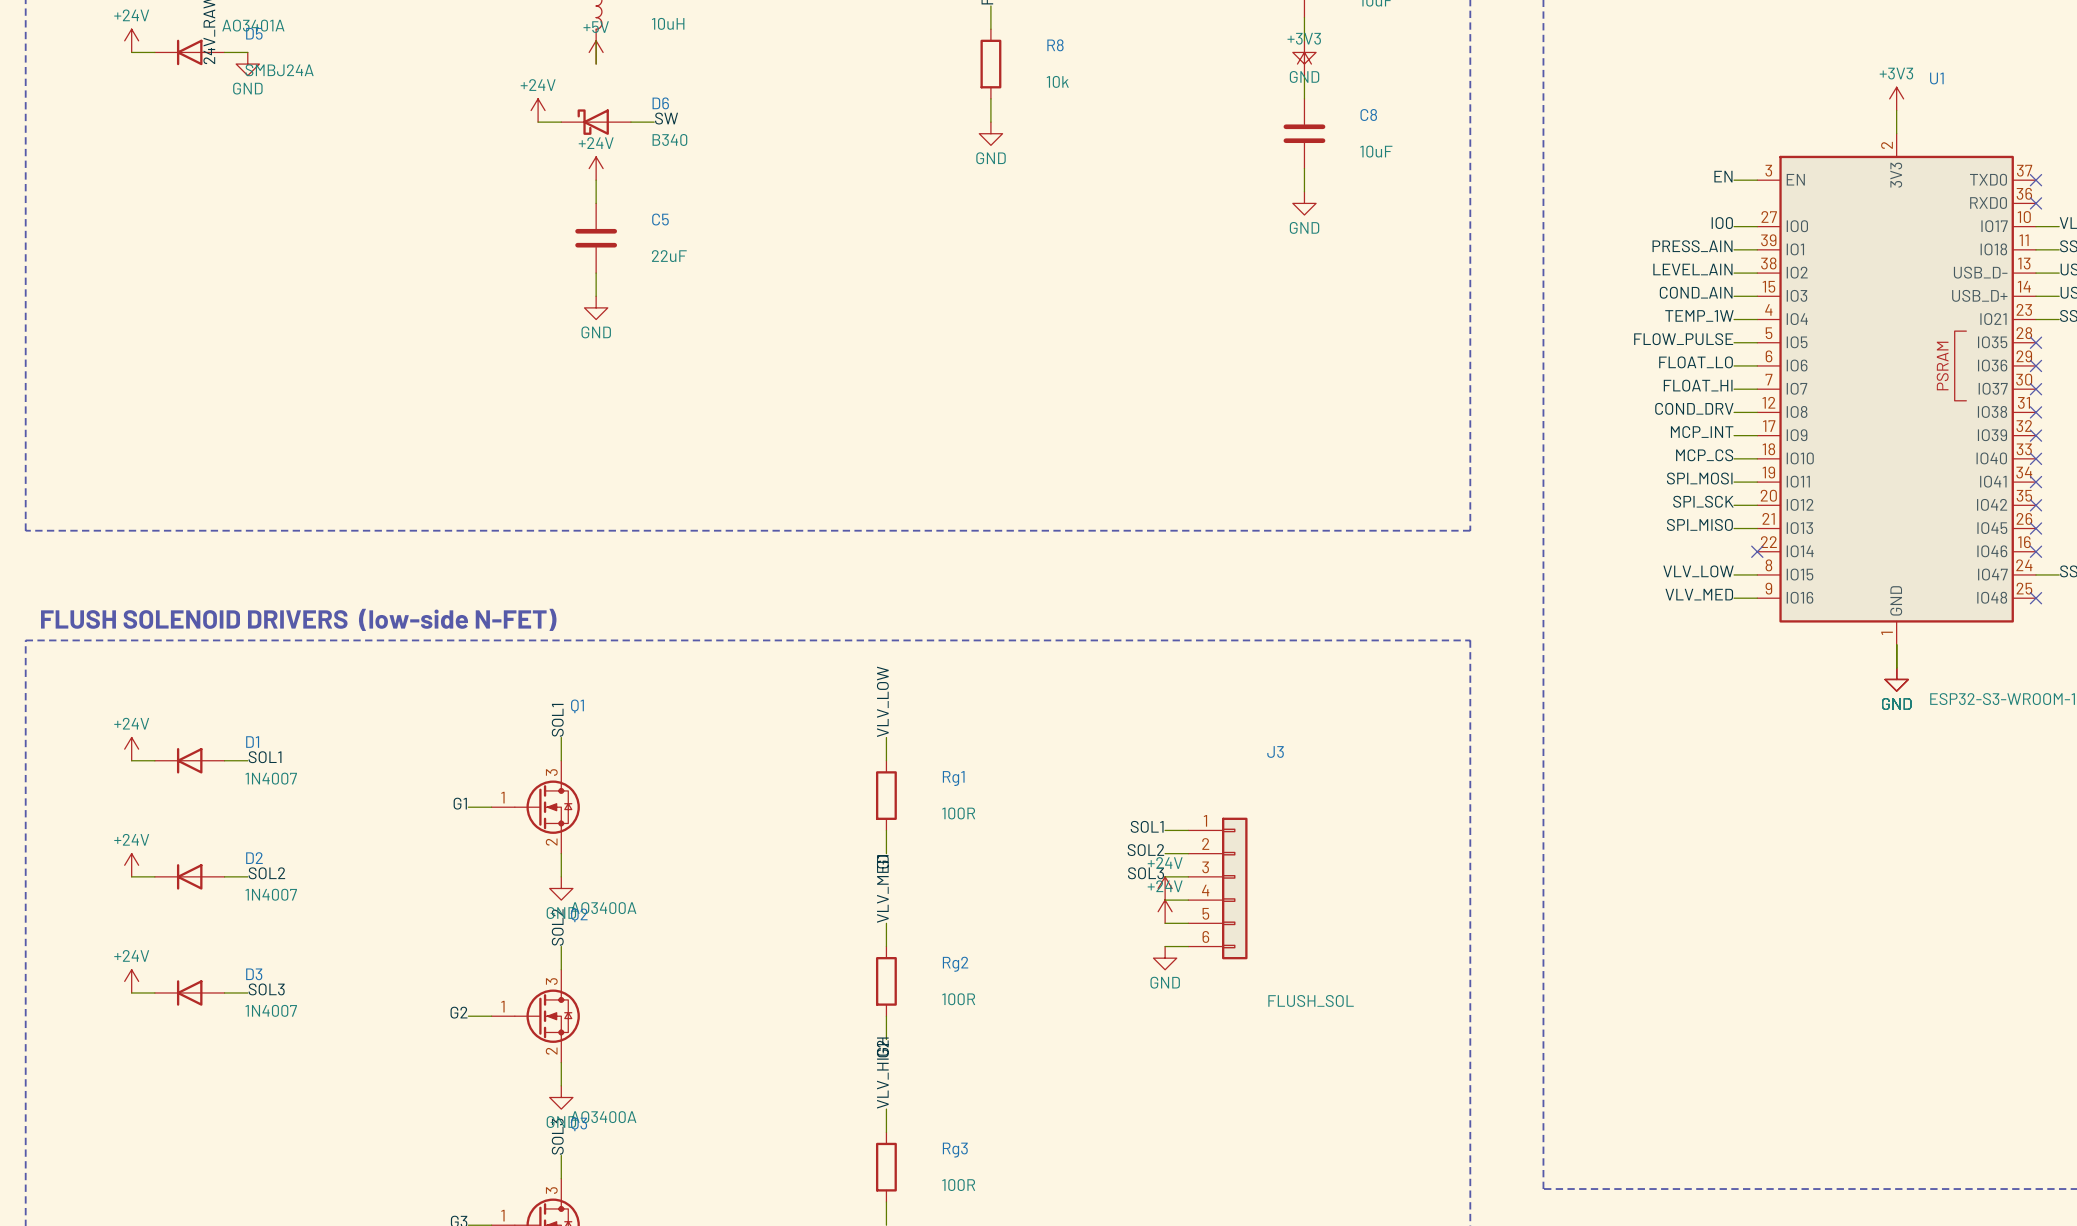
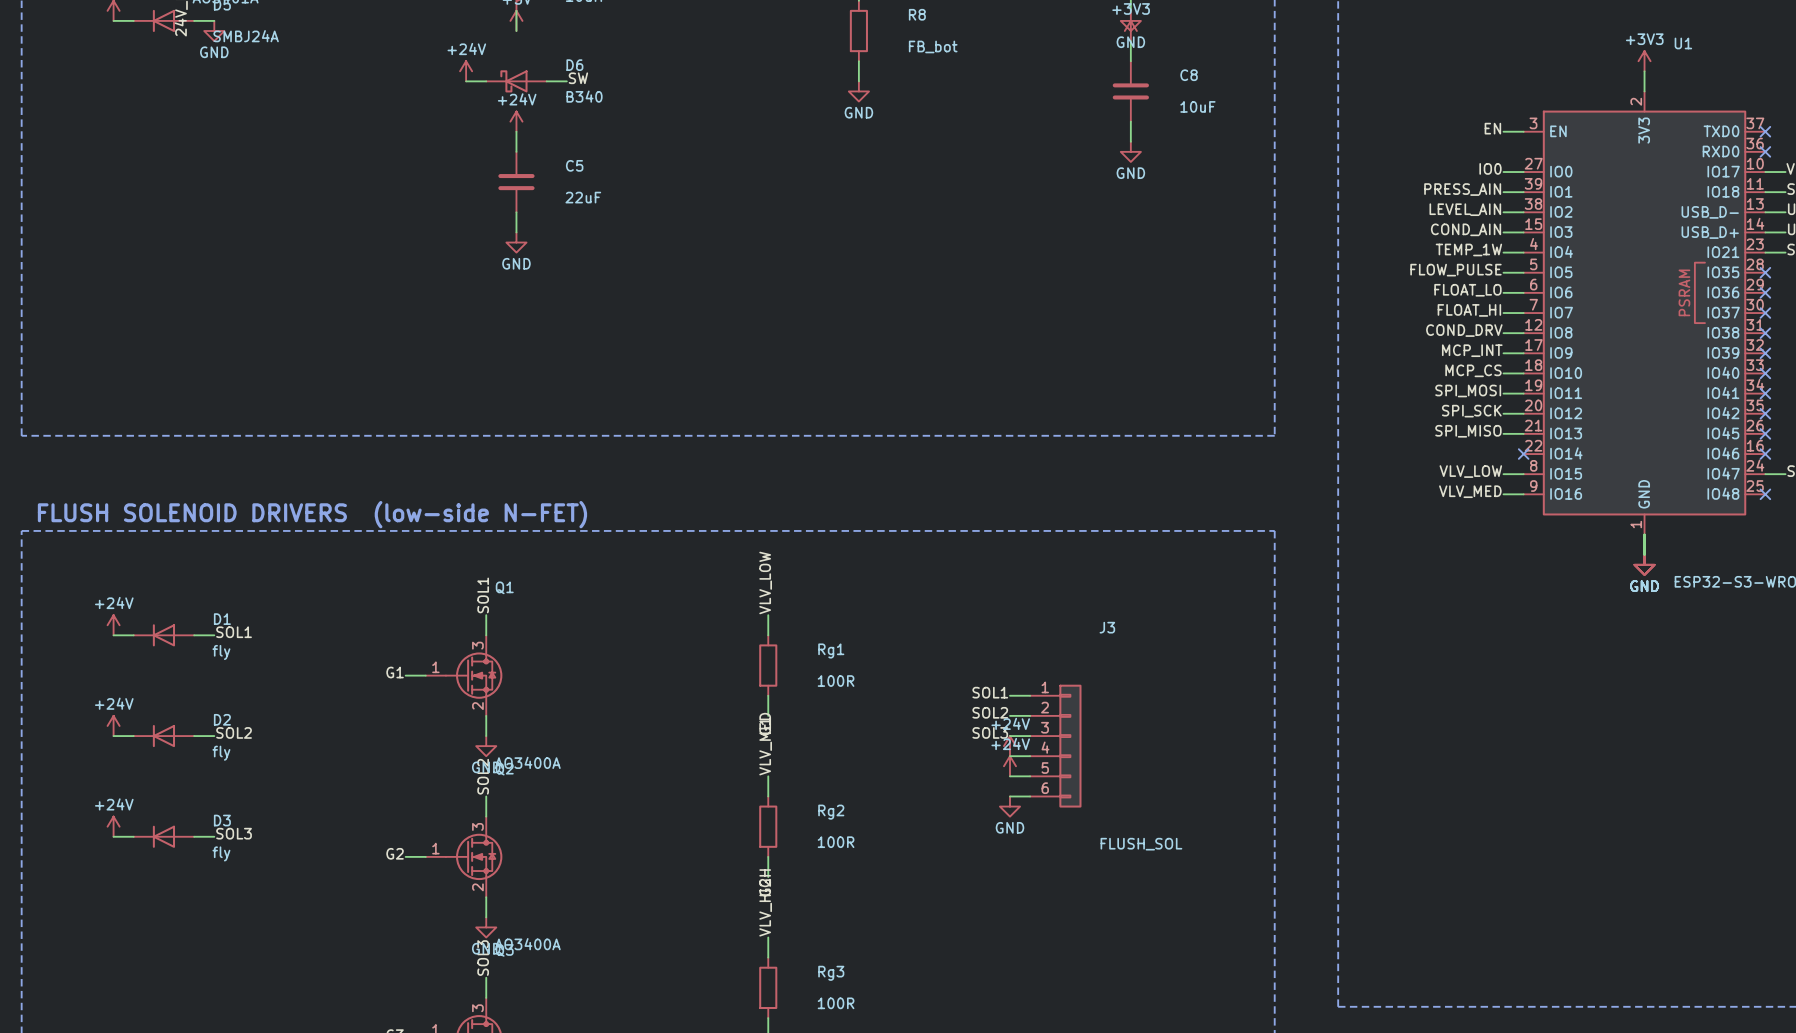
R8 value: 10k (1057, 81) -> FB_bot (933, 46)
D1 value: 1N4007 (271, 778) -> fly (221, 652)
D2 value: 1N4007 (271, 894) -> fly (221, 753)
D3 value: 1N4007 (271, 1010) -> fly (221, 853)

